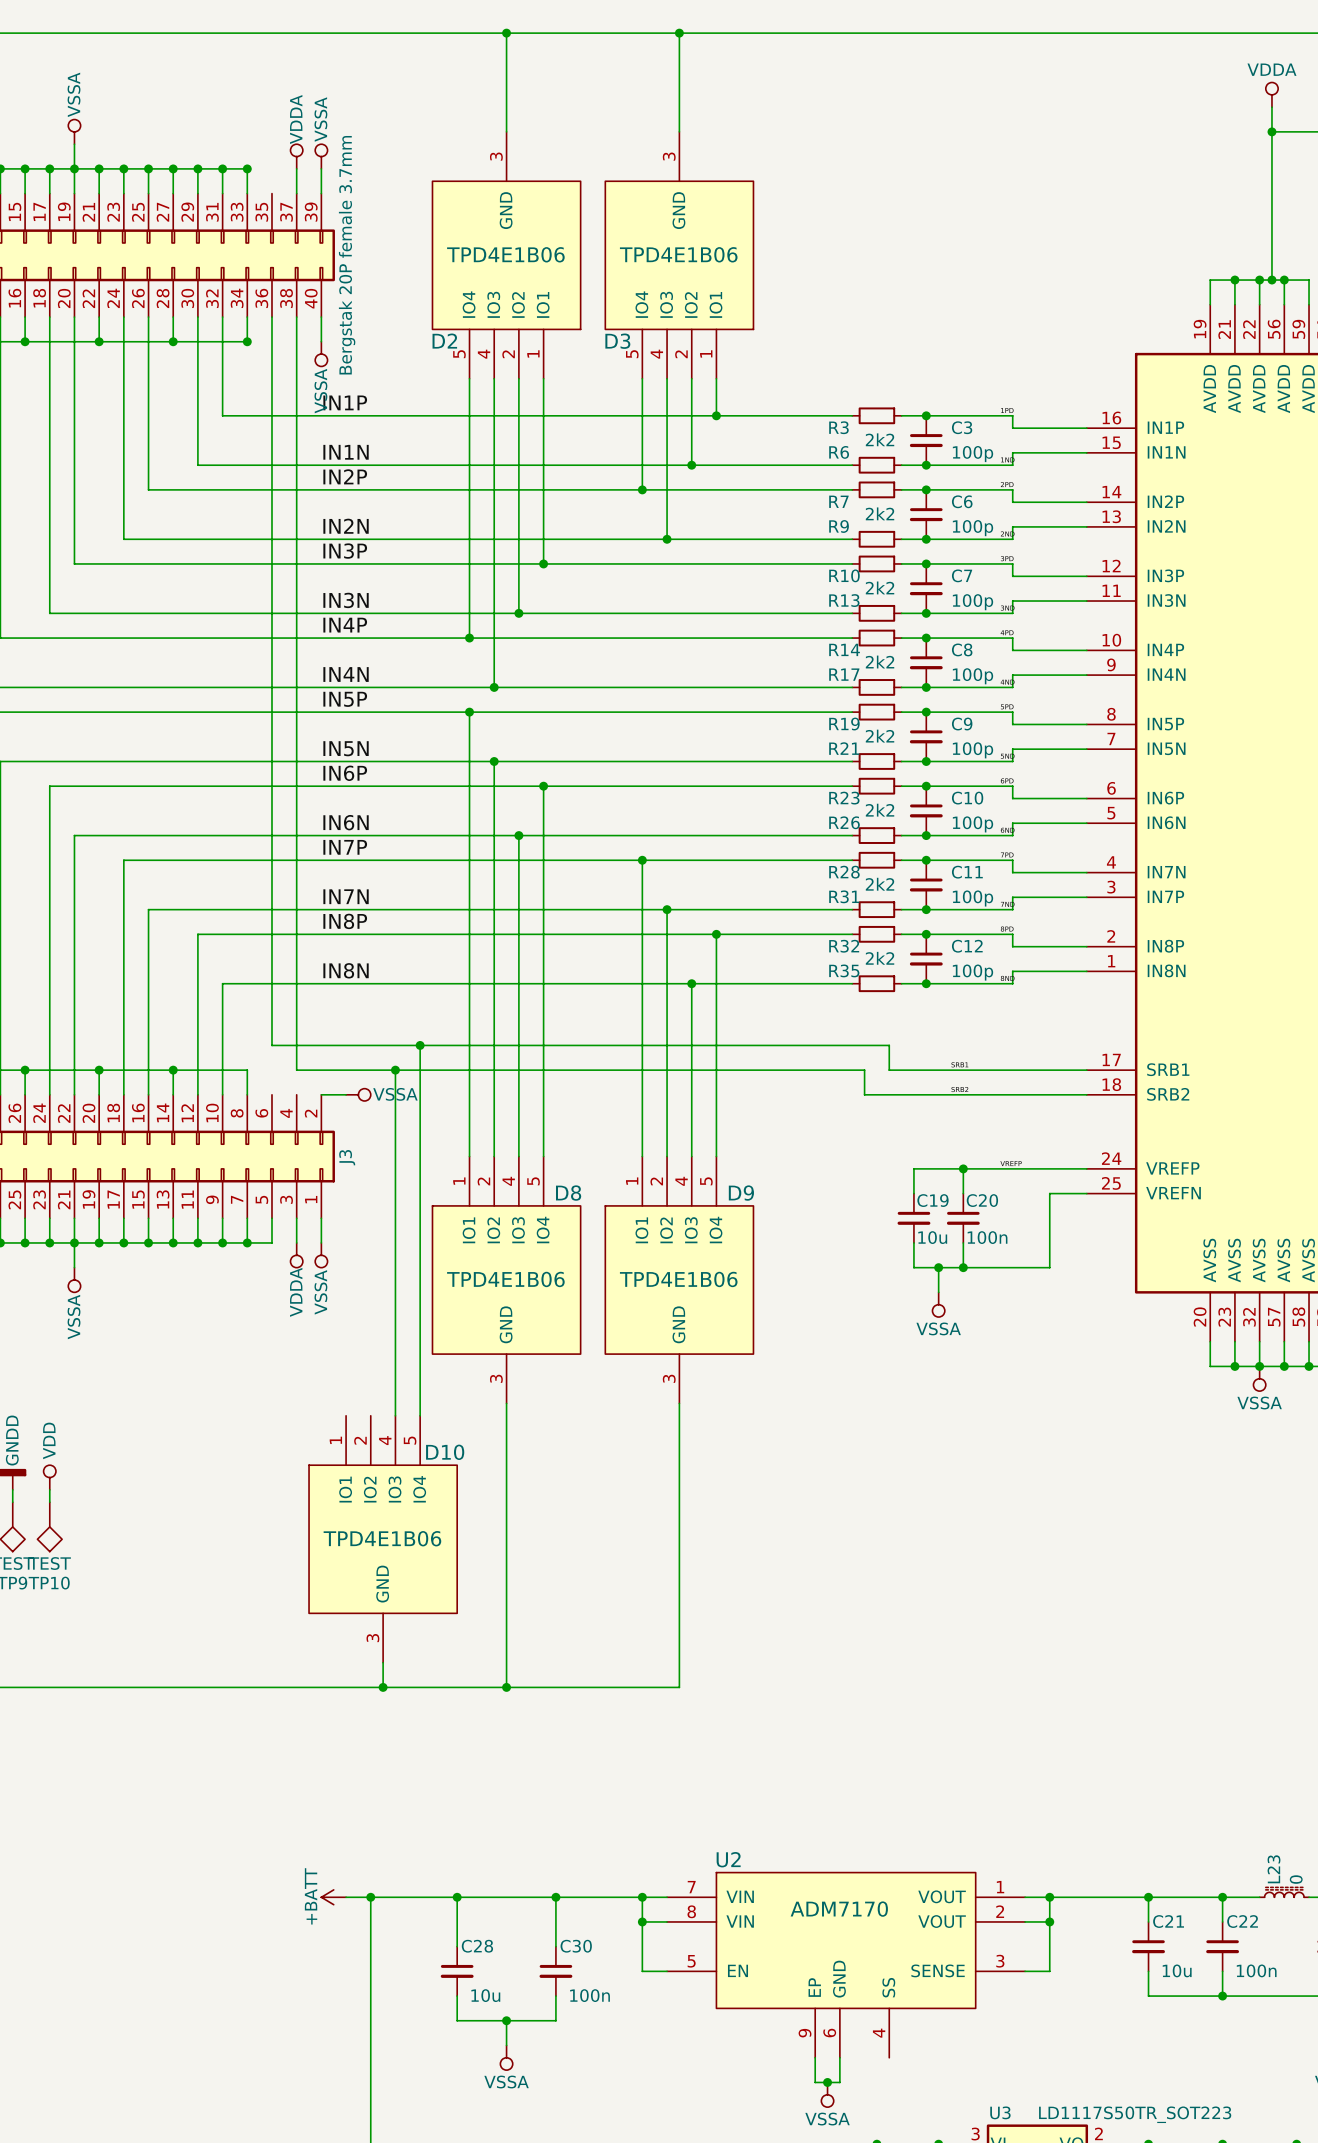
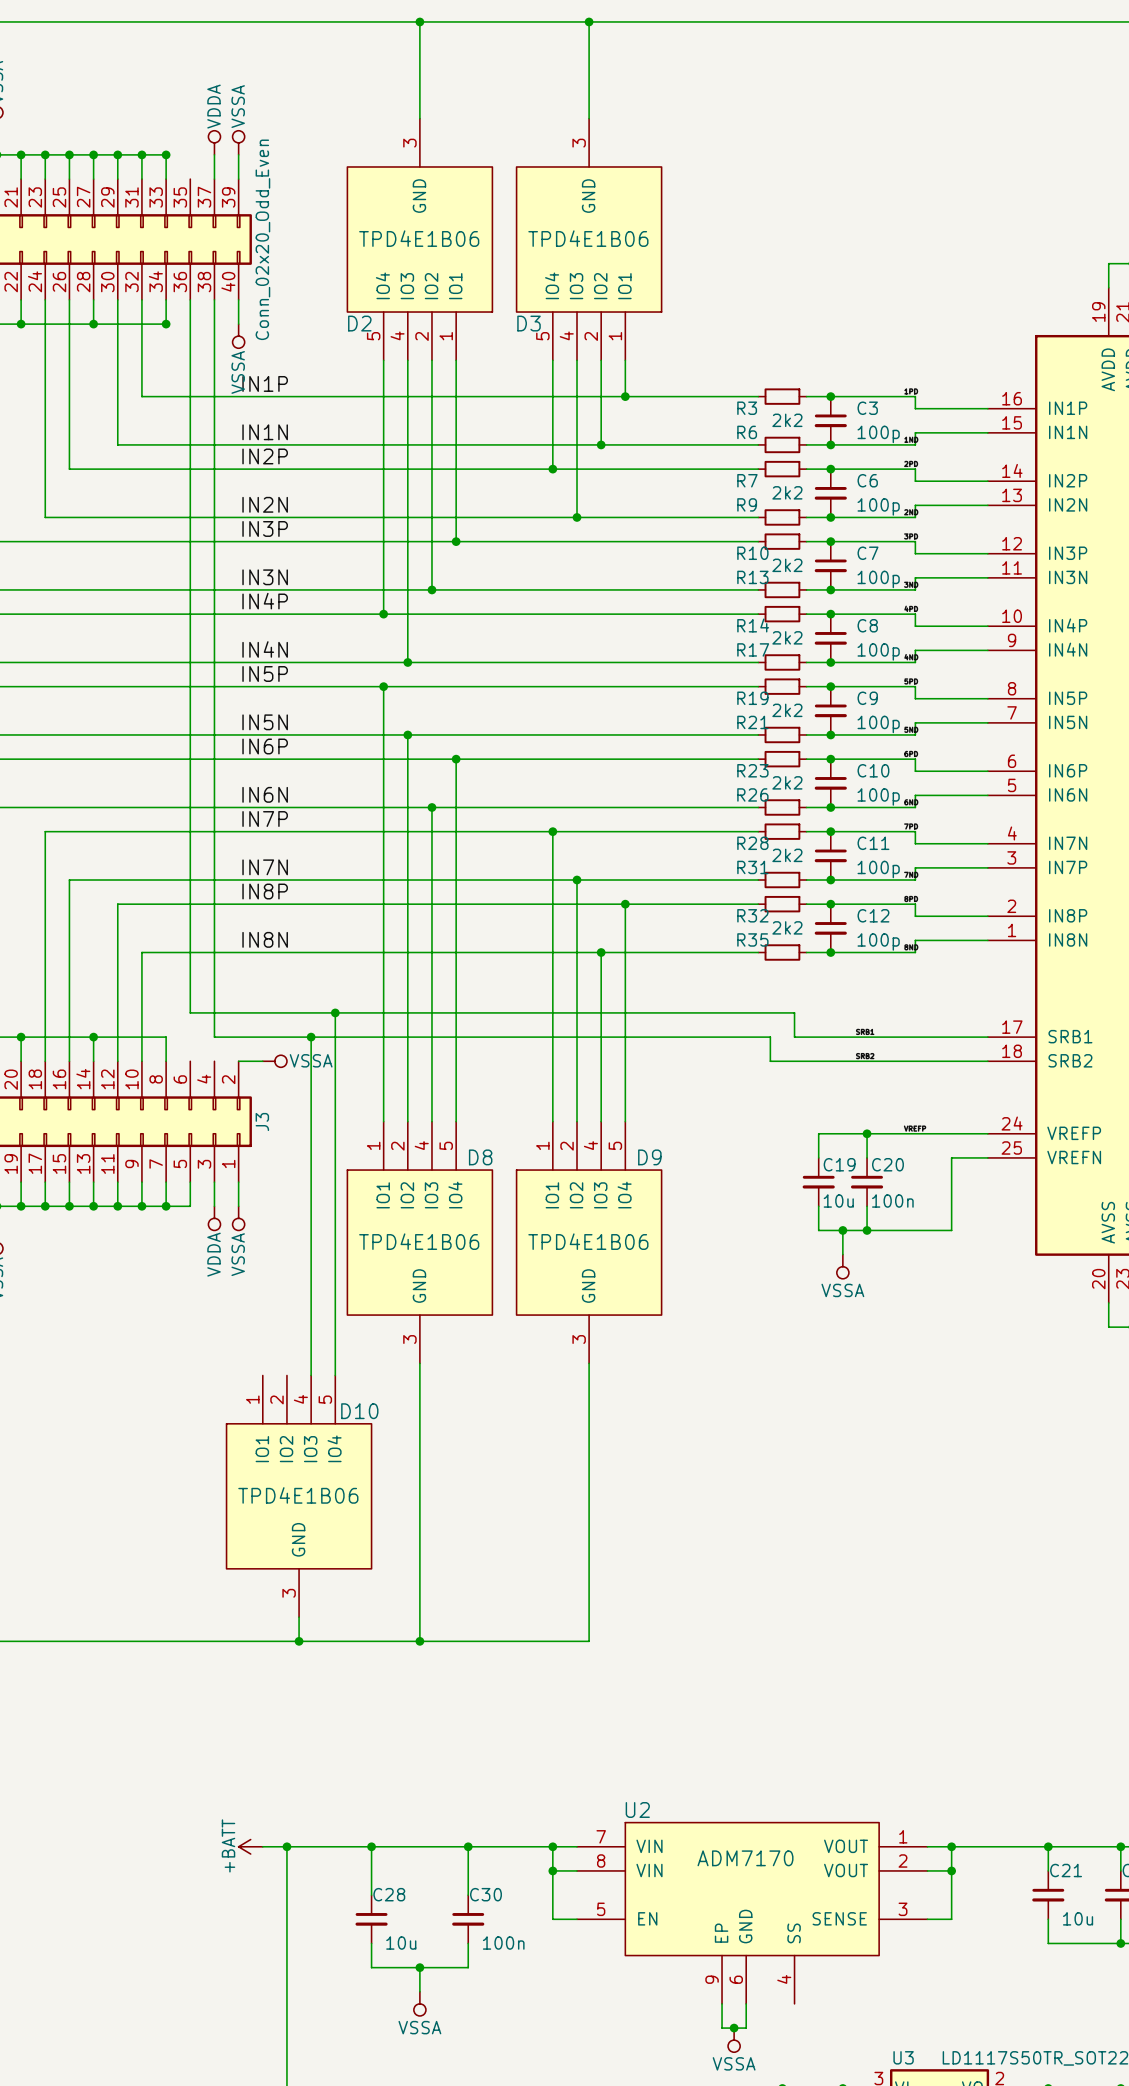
part value: Bergstak 20P female 3.7mm (347, 255) -> Conn_02x20_Odd_Even (262, 239)

